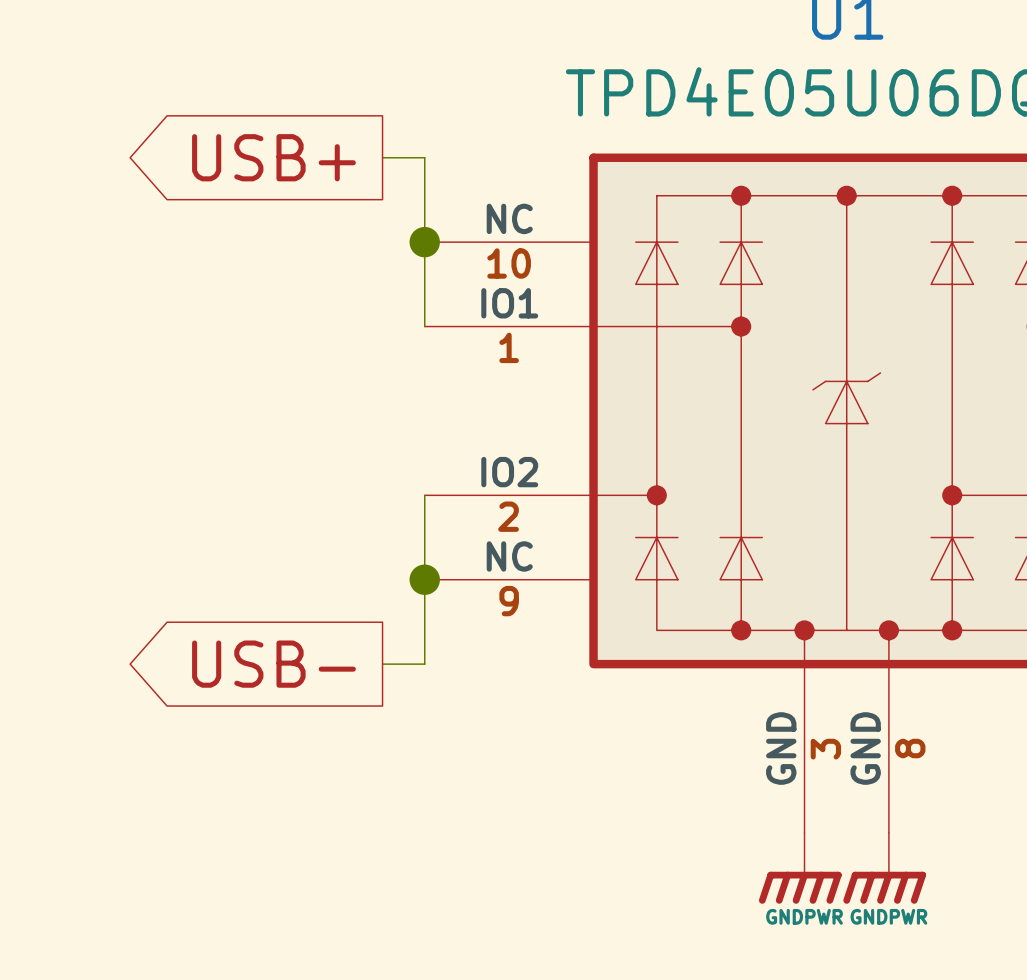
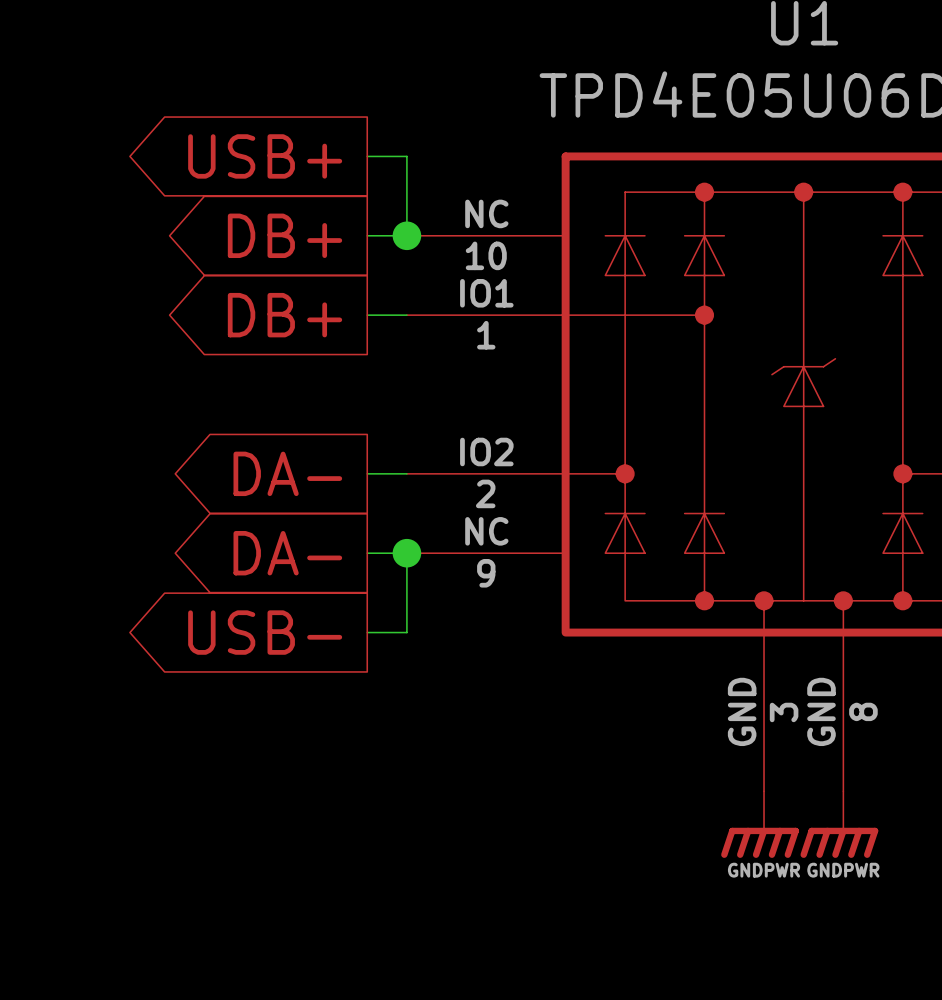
global label: none -> DB+ (284, 235)
wire: (424, 242) (424, 326) -> (406, 235) (367, 235)
global label: none -> DB+ (284, 315)
wire: none -> (367, 315) (406, 315)
global label: none -> DA- (287, 473)
wire: (424, 495) (424, 579) -> (406, 473) (367, 473)
global label: none -> DA- (287, 553)
wire: none -> (367, 553) (406, 553)

